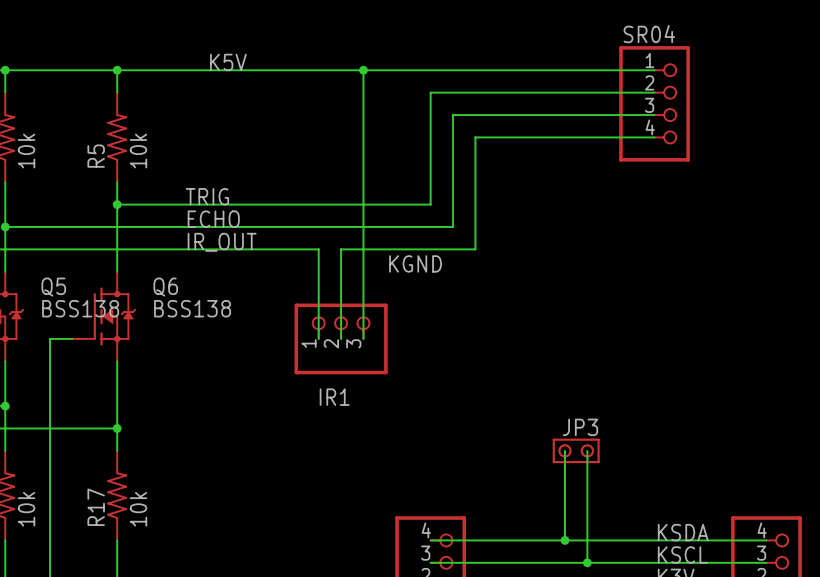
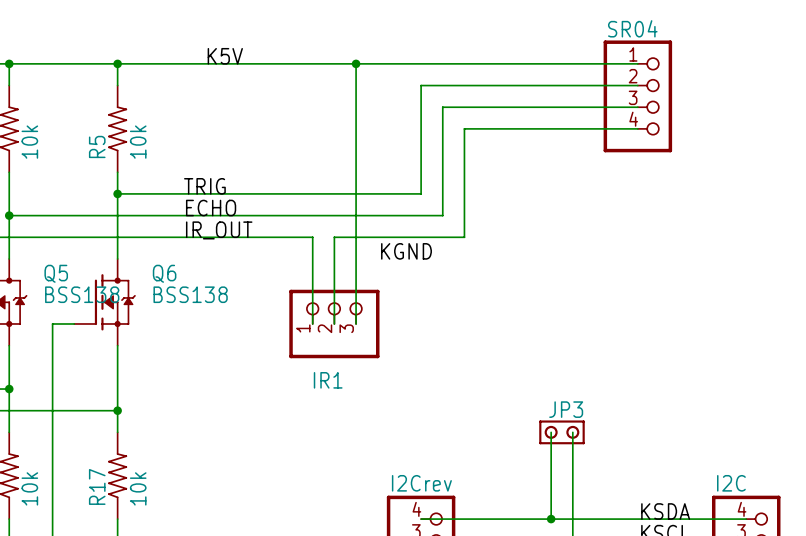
part value: none -> I2Crev (421, 483)
part value: none -> I2C (731, 483)

